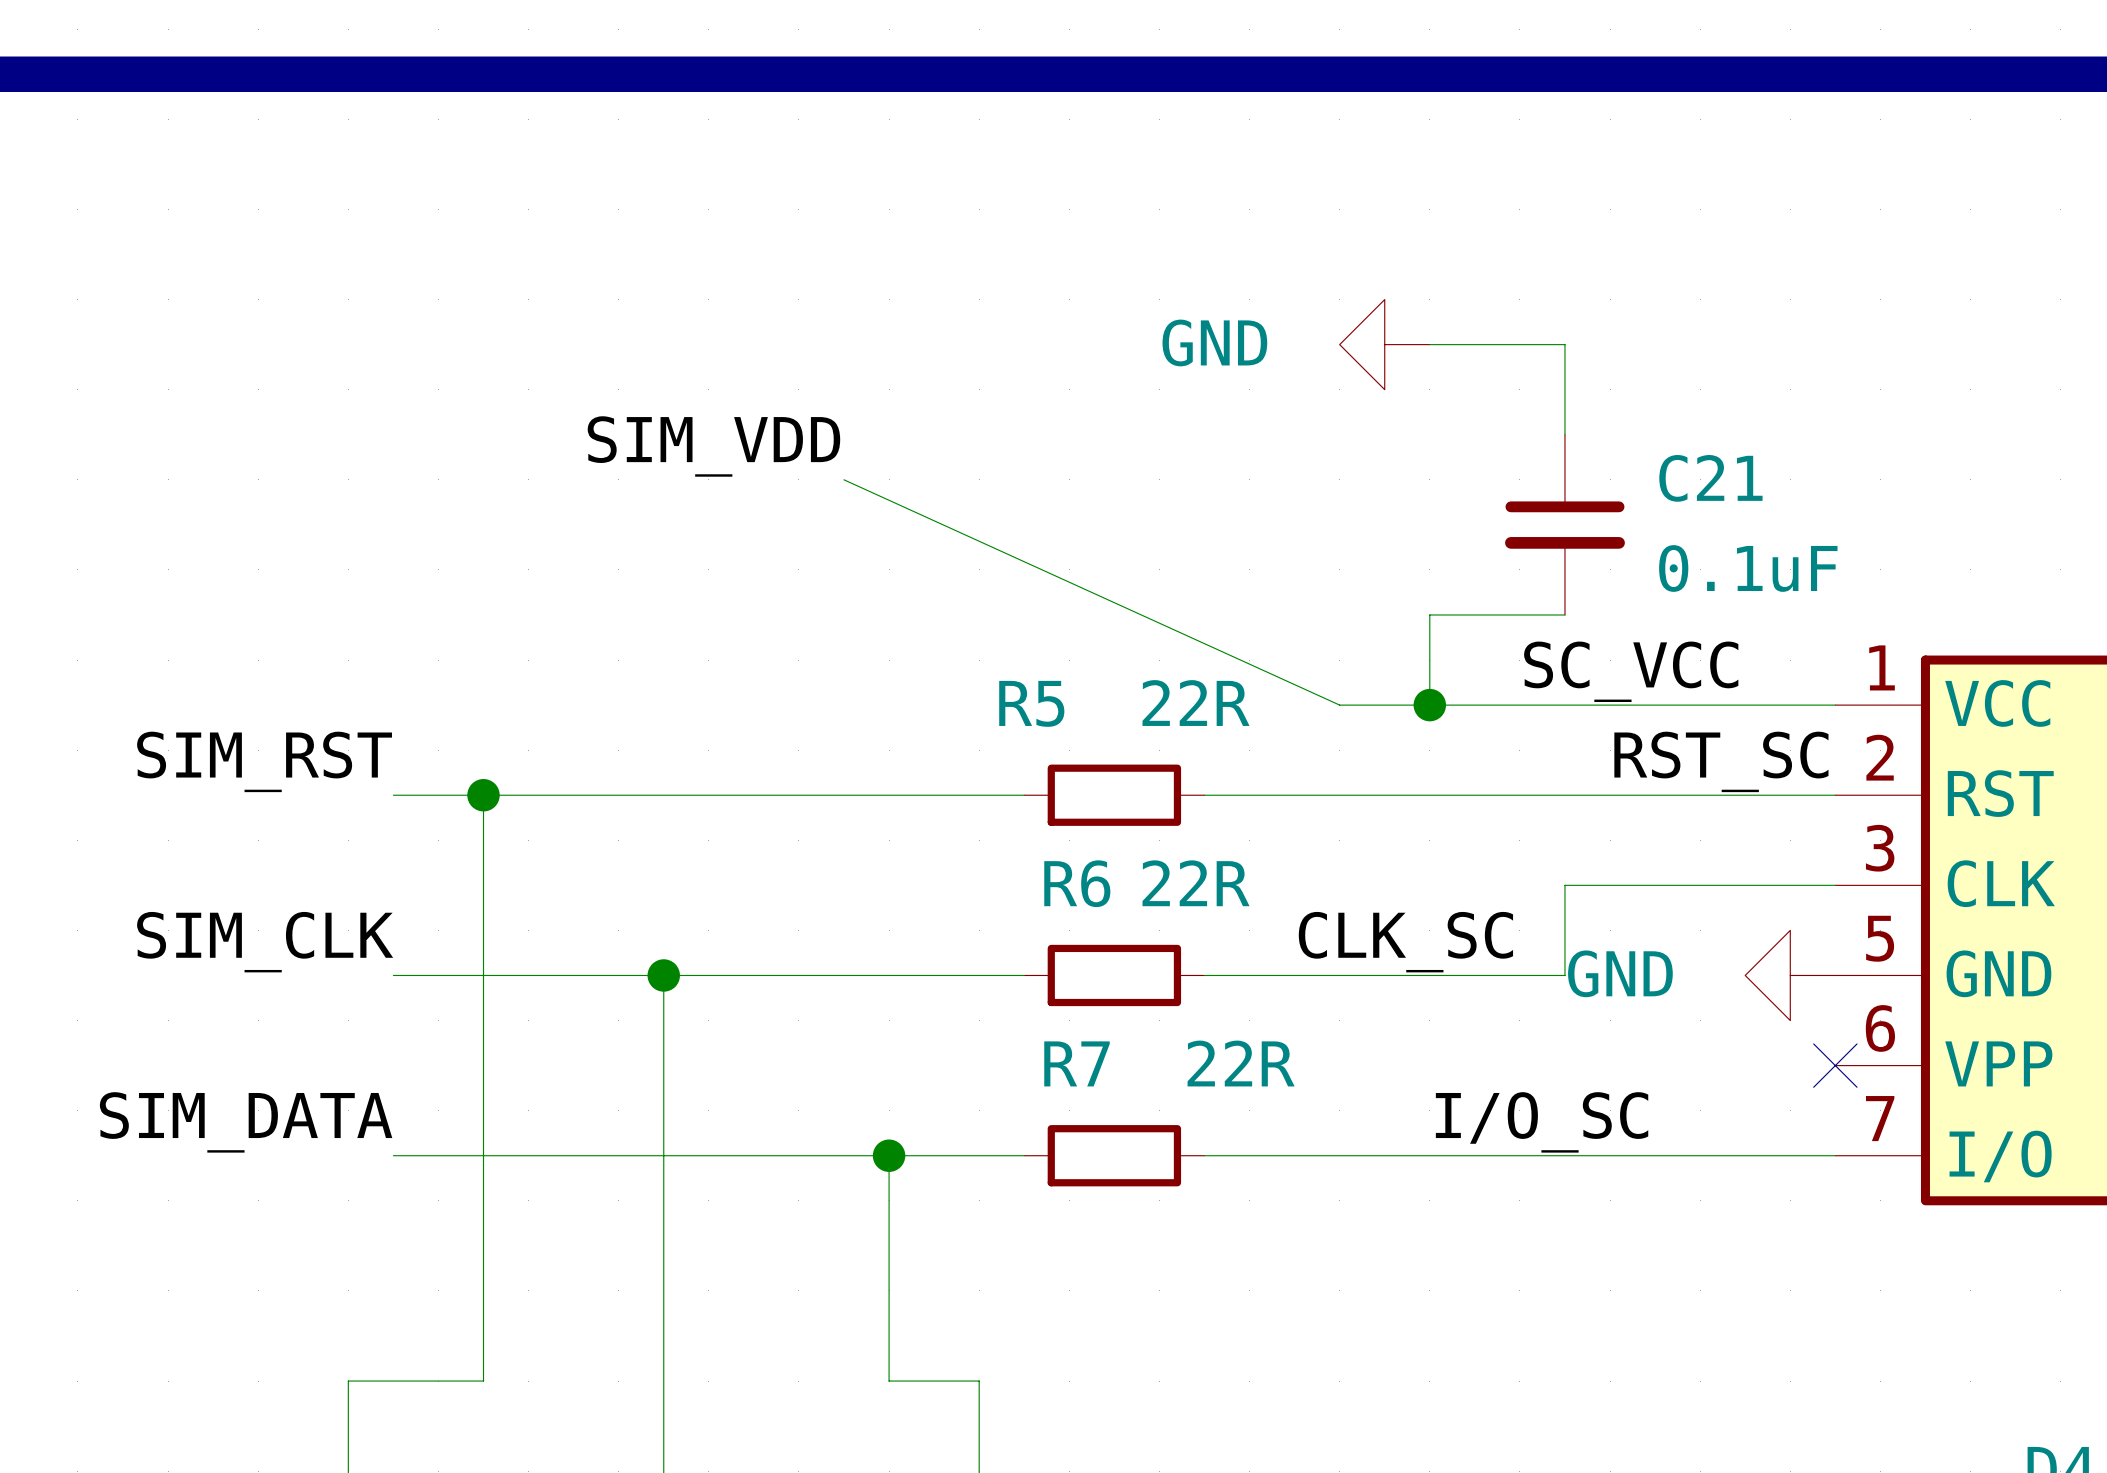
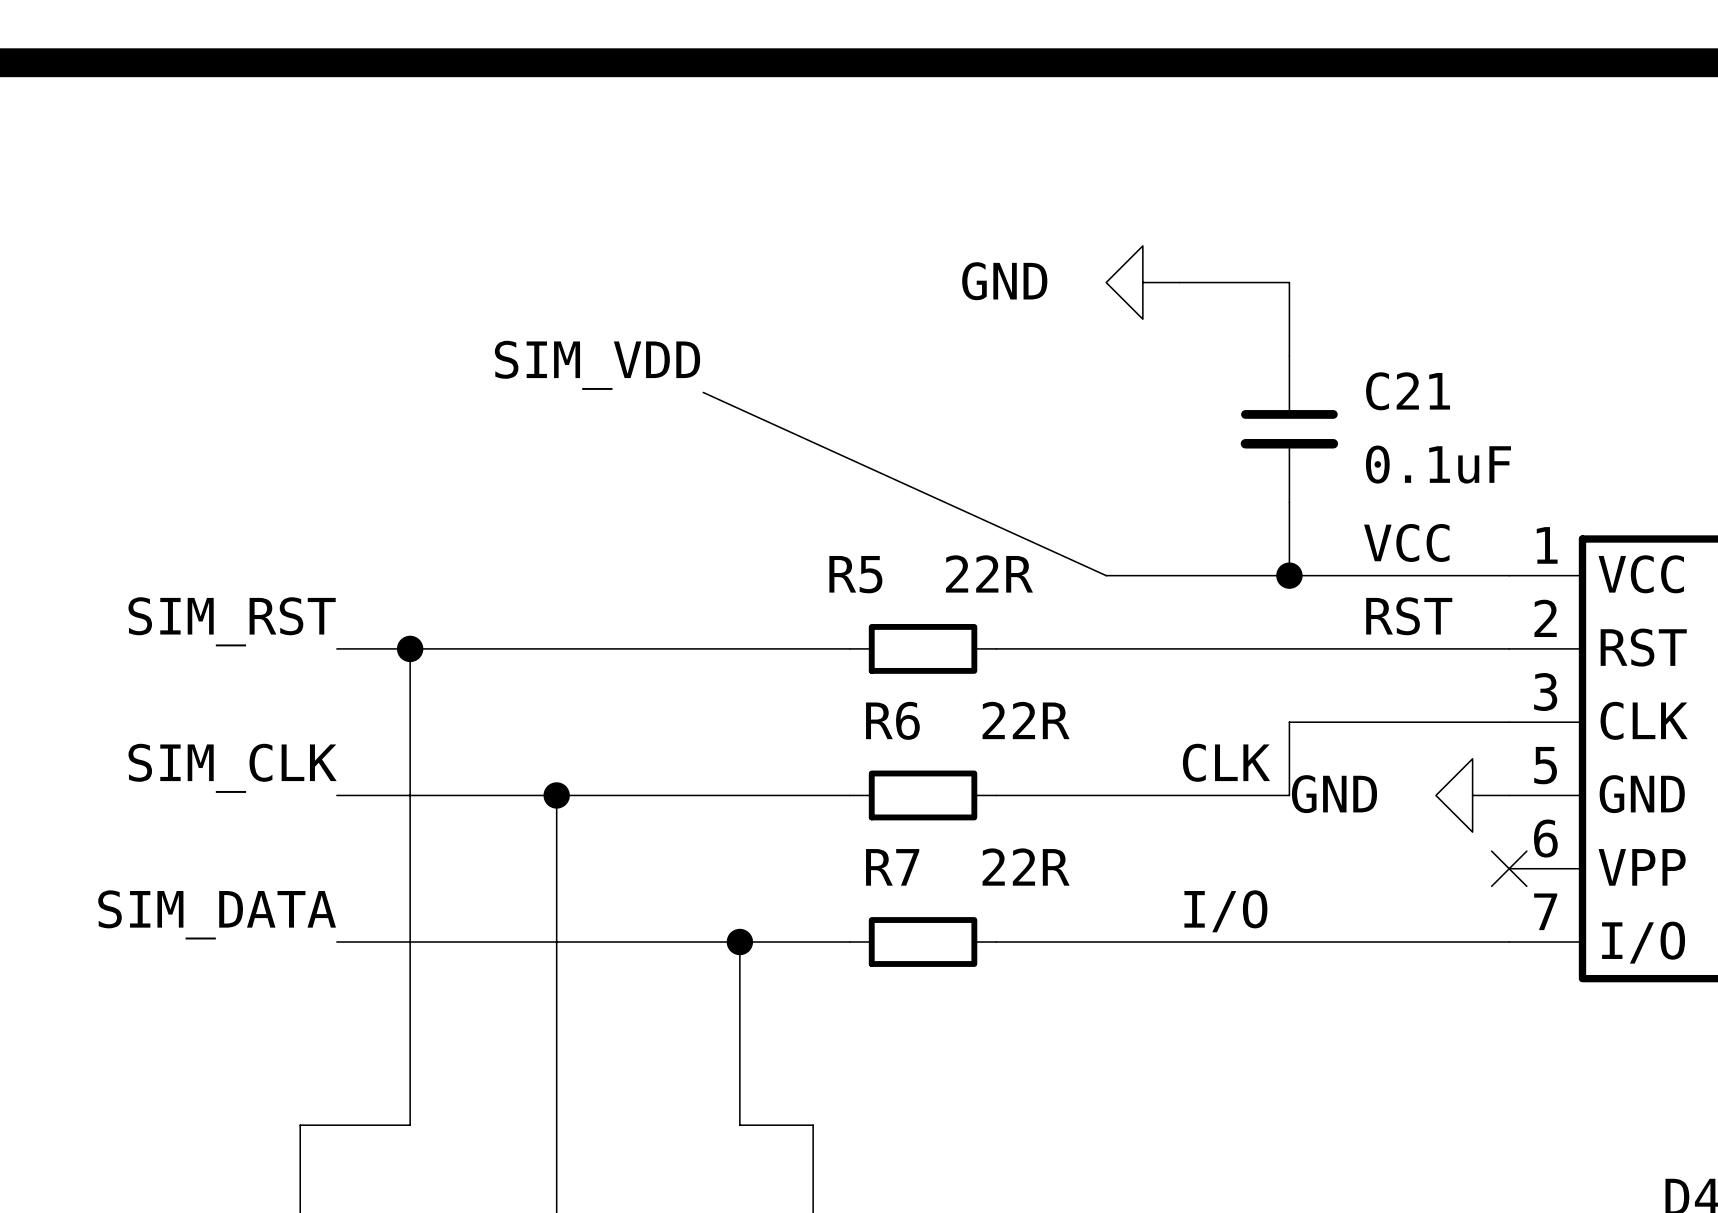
wire: (1564, 614) (1429, 614) (1429, 705) -> (1289, 502) (1289, 575)
label: SC_VCC (1631, 671) -> VCC (1406, 542)
junction position: (1429, 705) -> (1289, 575)
label: RST_SC (1721, 761) -> RST (1409, 616)
R6 value position: 22R (1196, 883) -> 22R (1026, 720)
label: CLK_SC (1405, 942) -> CLK (1226, 762)
label: I/O_SC (1542, 1122) -> I/O (1225, 911)

